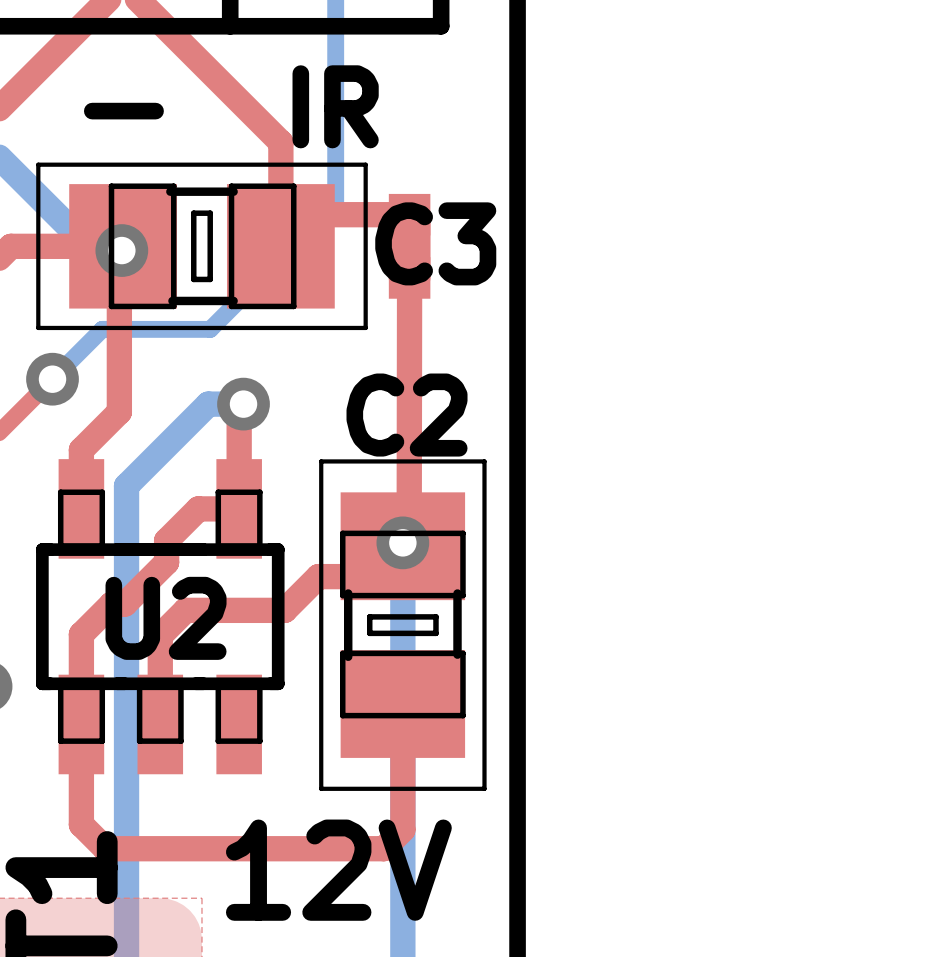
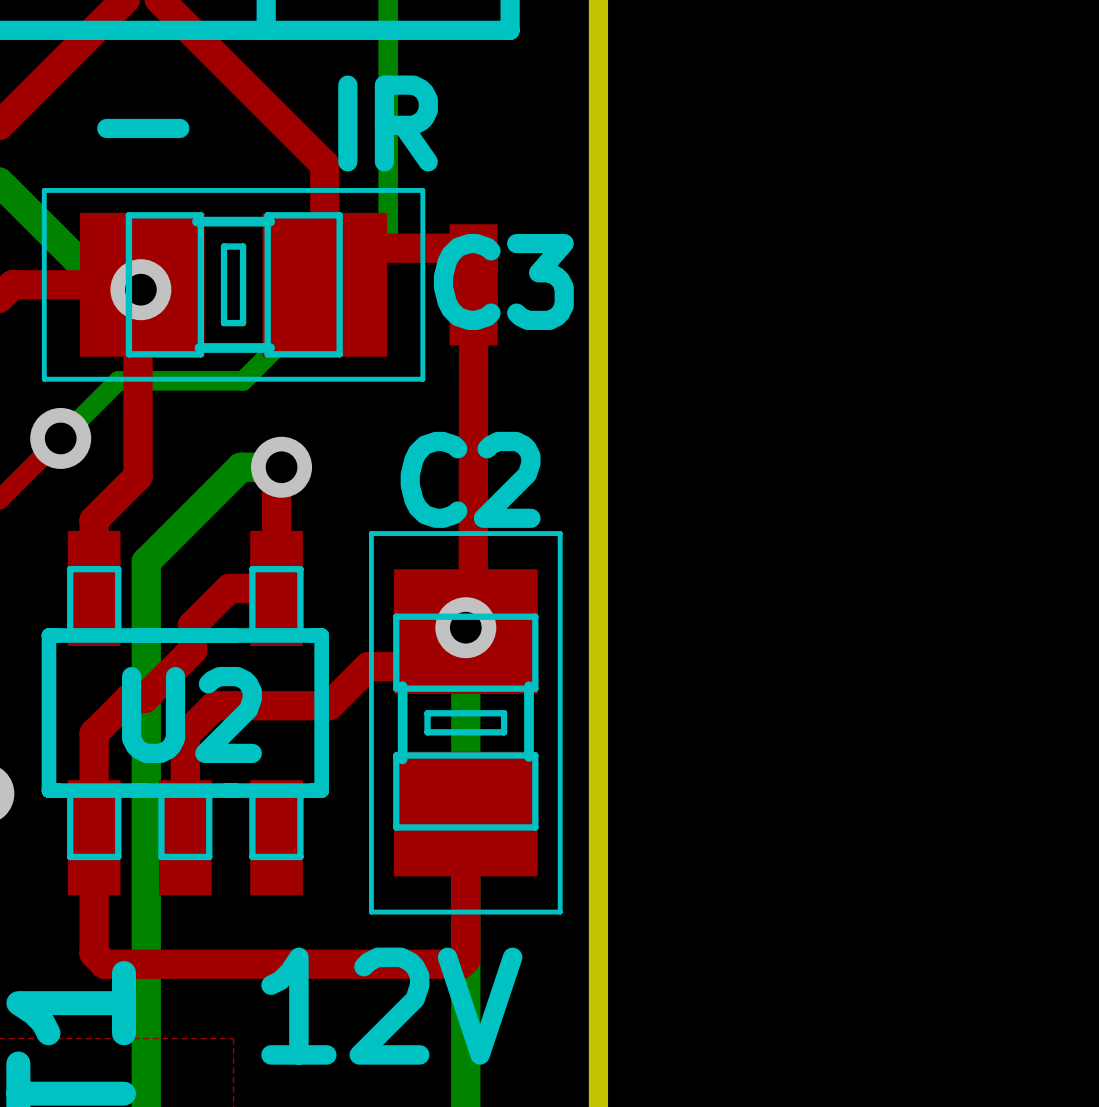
top track: (90, 833) (105, 848) (383, 848) (398, 833) -> (104, 964) (460, 964)

